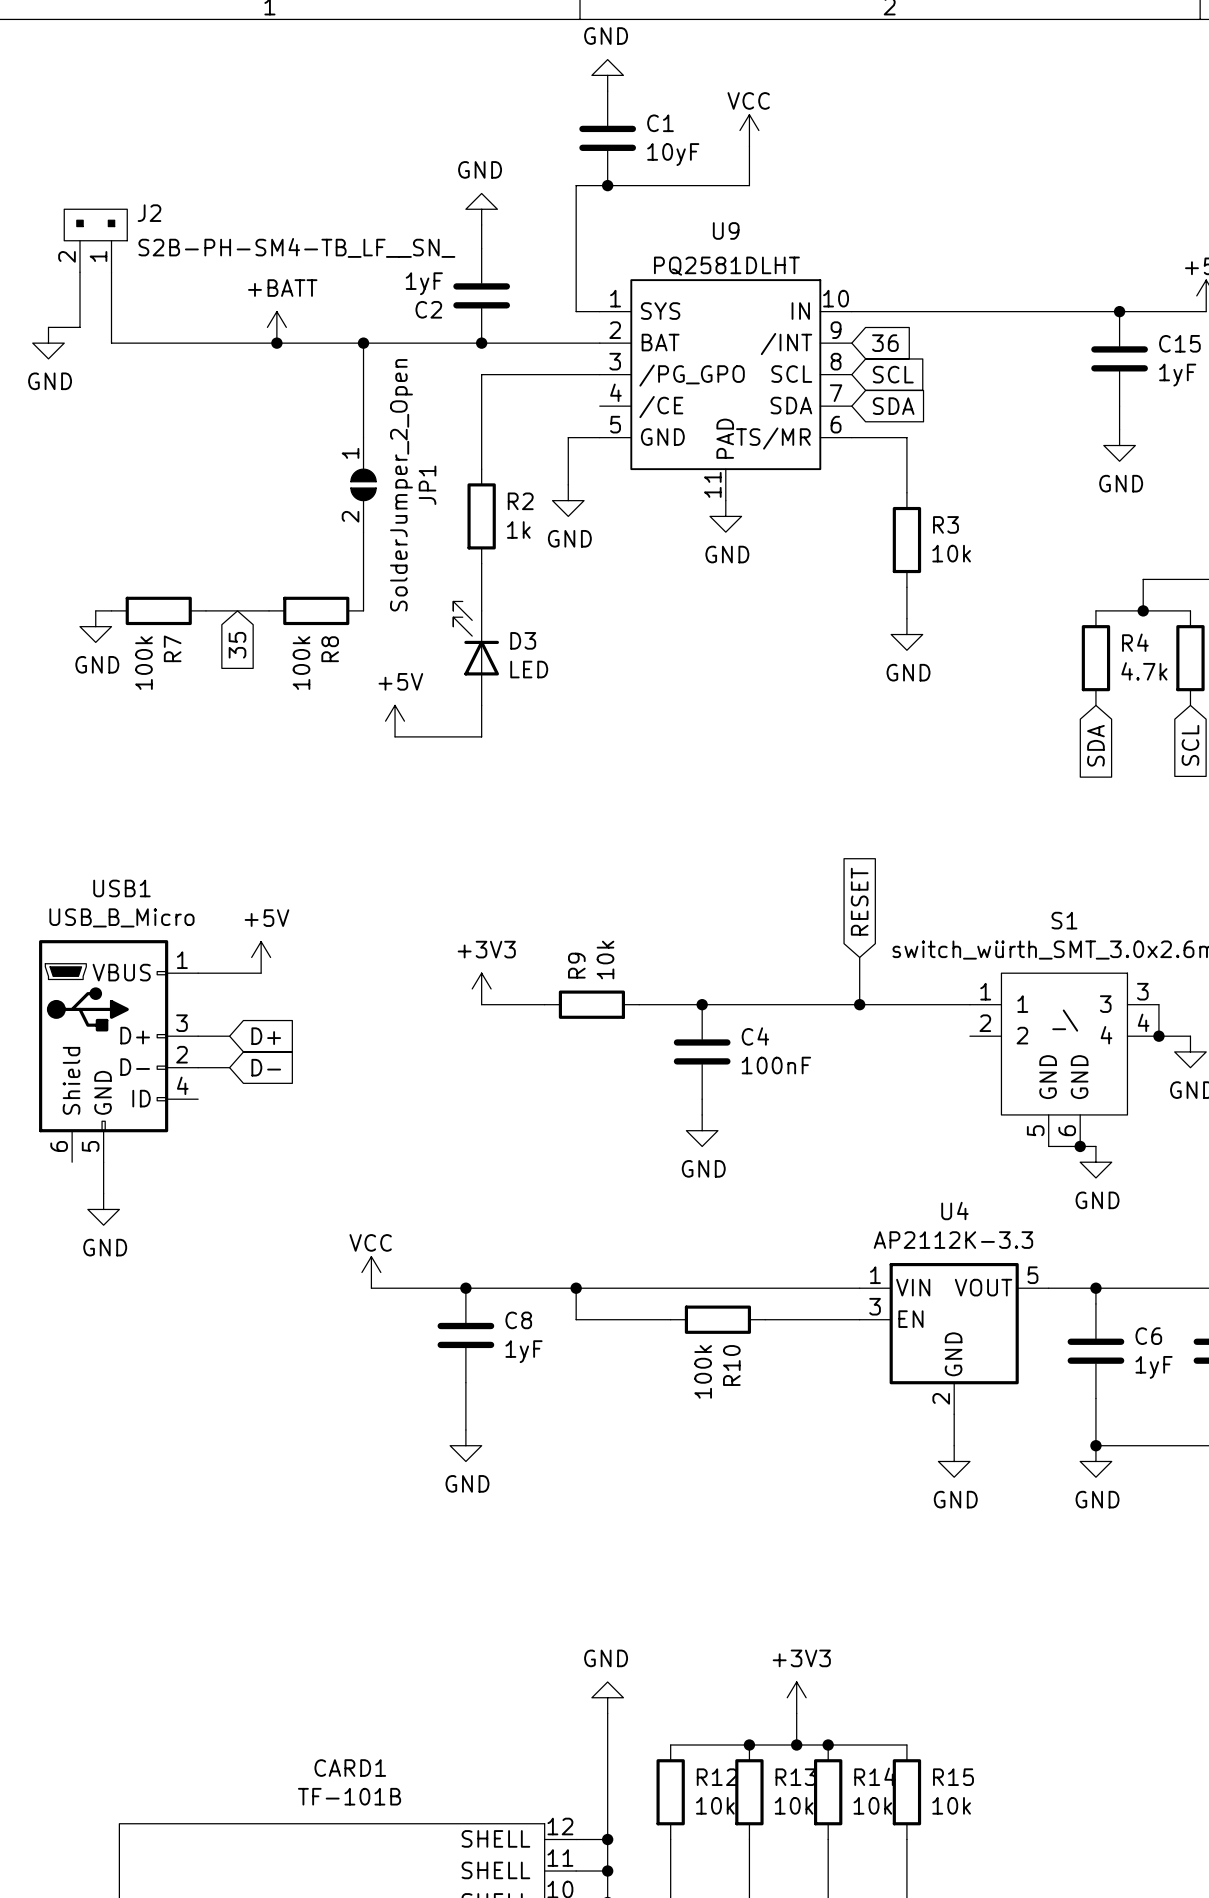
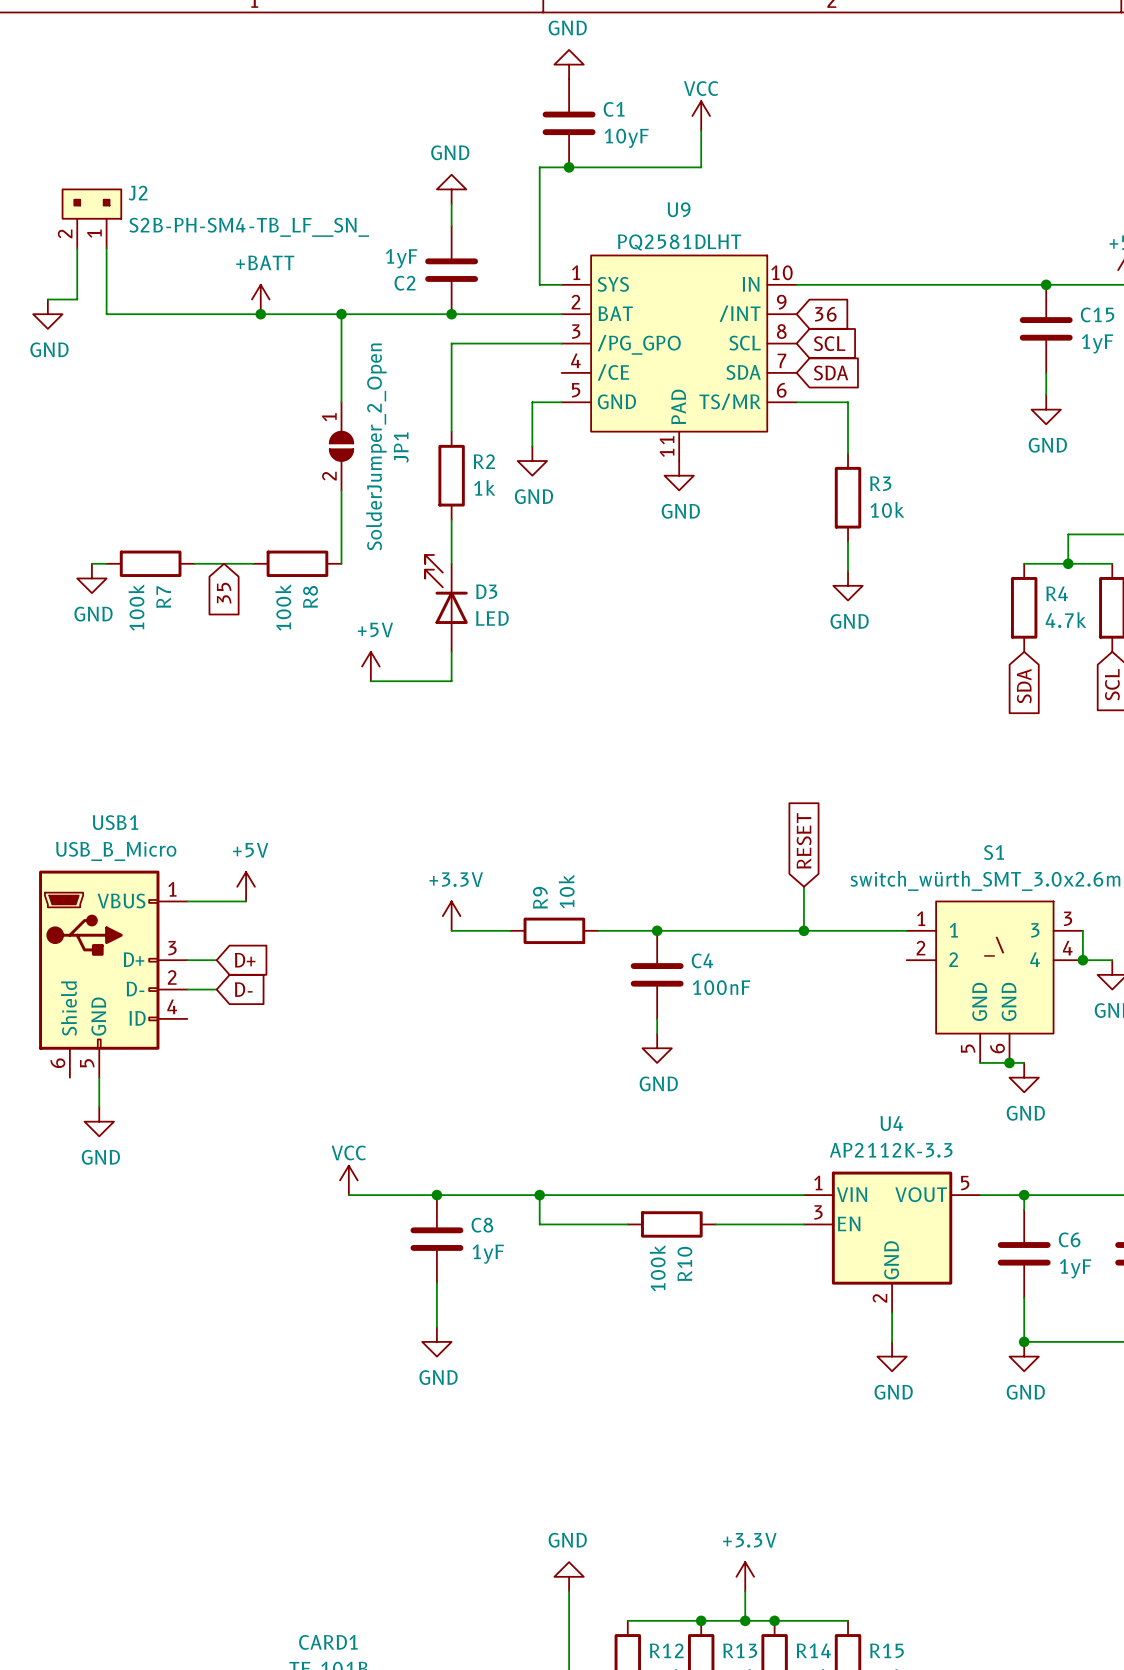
power symbol: +3V3 (481, 988) -> +3.3V (451, 916)
power symbol: +3V3 (796, 1697) -> +3.3V (745, 1576)

